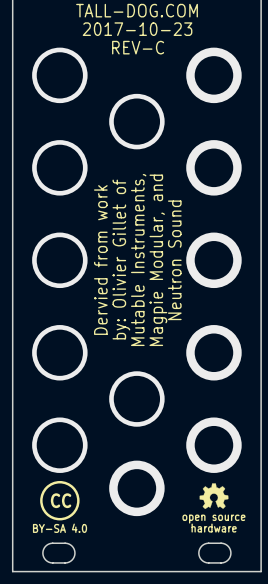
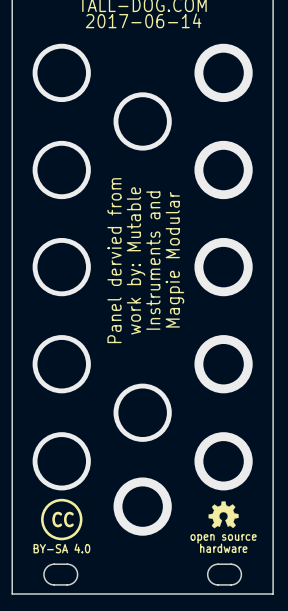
text: 2017-10-23 (137, 29) -> 2017-06-14 (143, 20)
text: REV-C (138, 47) -> none
text: none -> work by: Mutable (136, 260)
text: by: Olivier Gillet of (121, 259) -> none
text: Dervied from work (100, 260) -> Panel dervied from (114, 260)
text: Mutable Instruments, (138, 260) -> Instruments and (153, 260)
text: Magpie Modular, and (158, 260) -> Magpie Modular (174, 259)
text: Neutron Sound (174, 260) -> none

